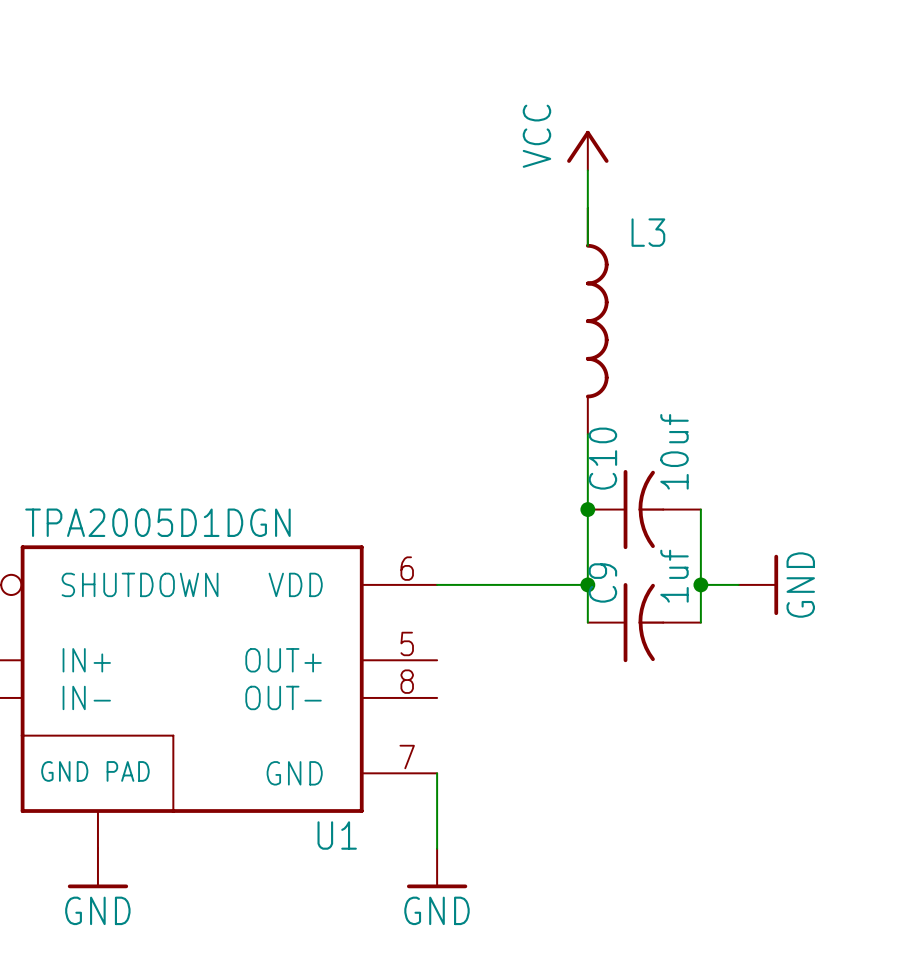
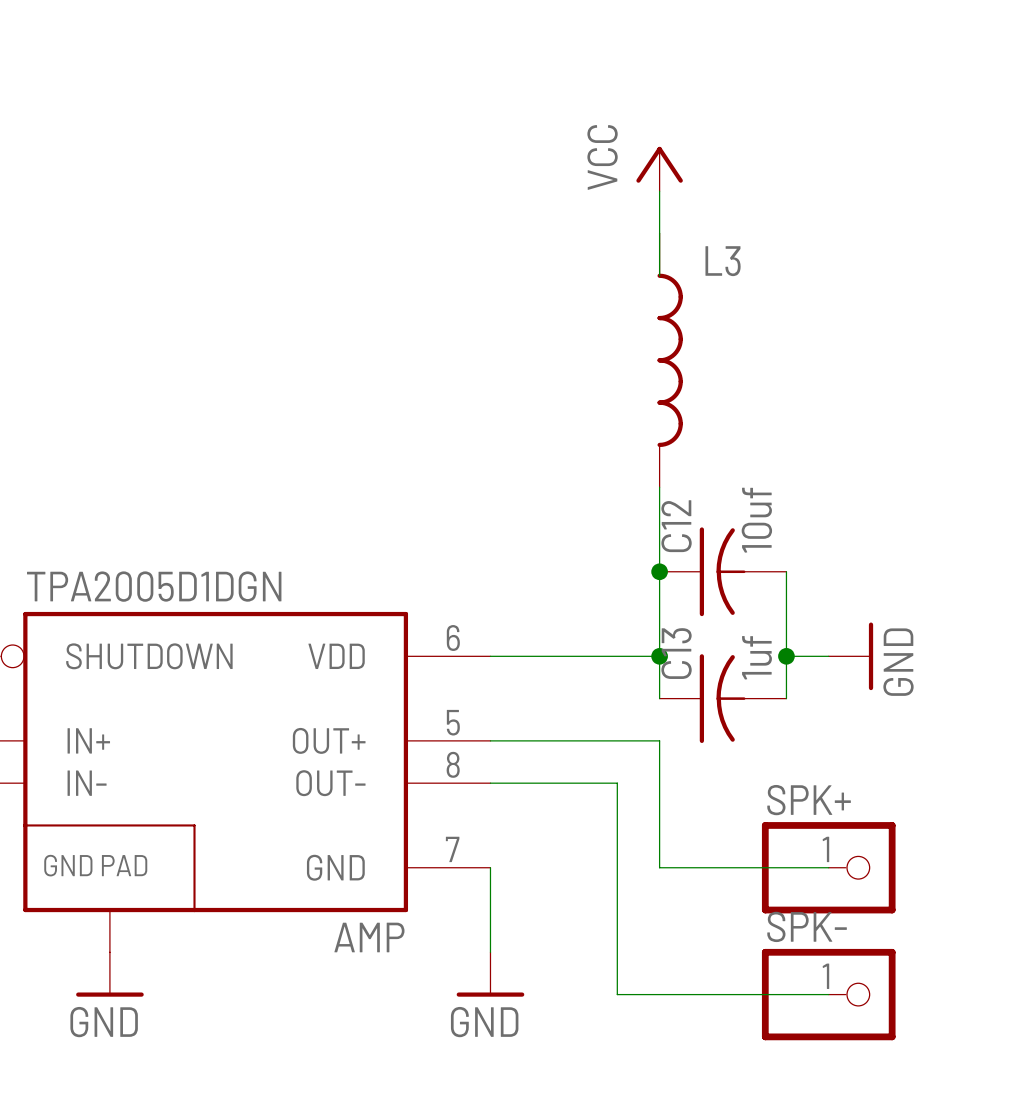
C10 name: C10 (602, 458) -> C12 (676, 526)
C9 name: C9 (602, 582) -> C13 (676, 653)
wire: none -> (490, 740) (659, 740) (659, 867) (828, 867)
wire: none -> (490, 783) (617, 783) (617, 994) (828, 994)
SPK+: none -> (828, 867)
U1 name: U1 (337, 835) -> AMP (369, 937)
SPK-: none -> (828, 994)

